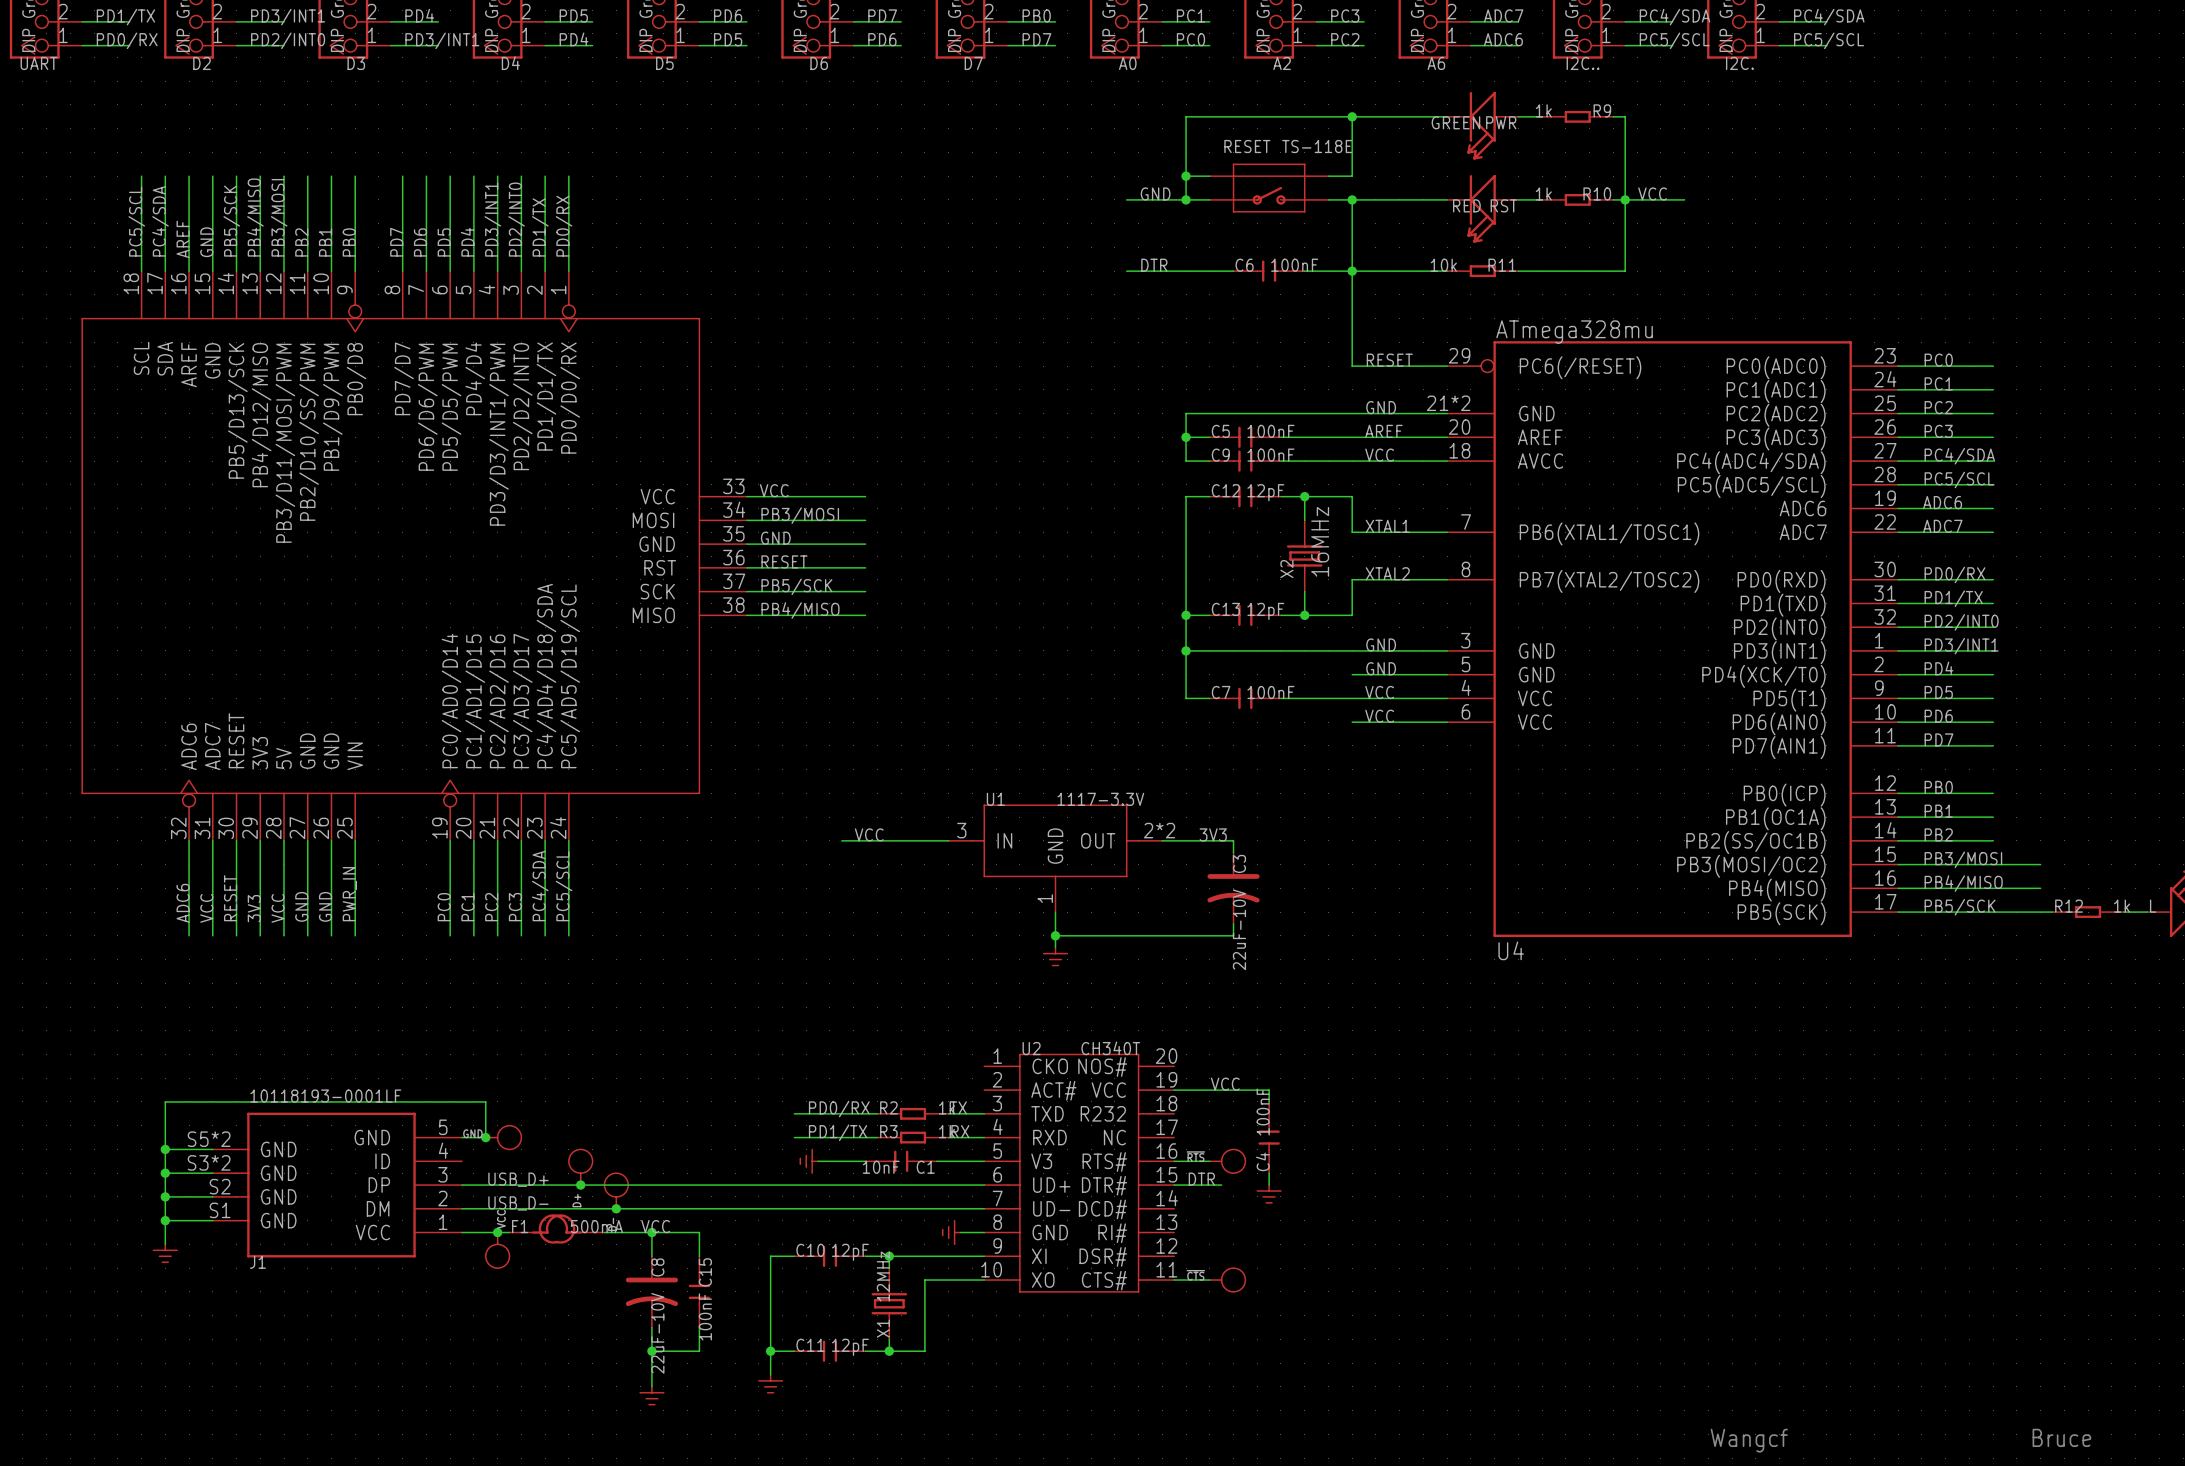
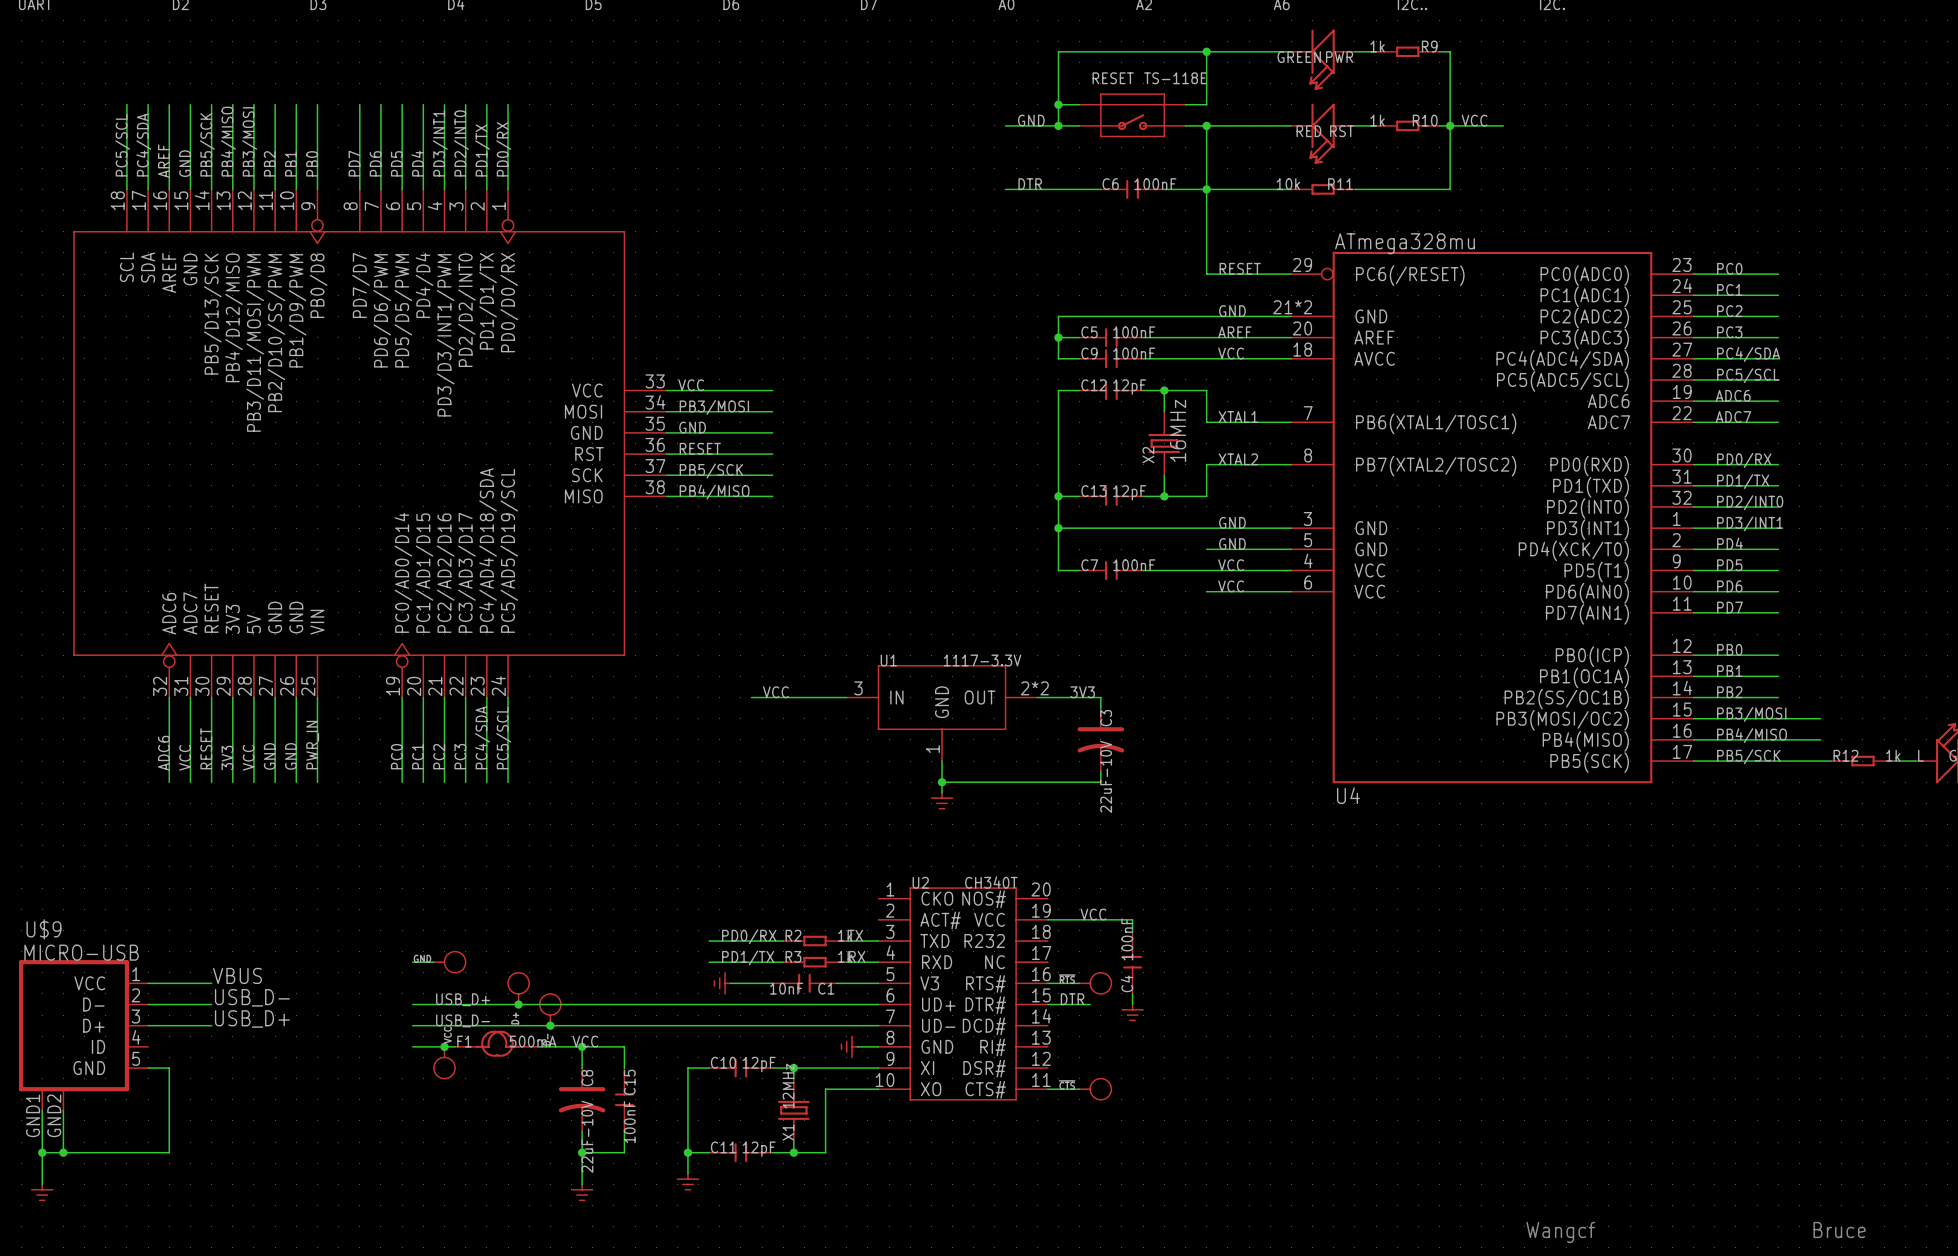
wire: (485, 1137) (485, 1101) (165, 1101) (165, 1244) -> none
junction: (485, 1137) -> none
wire: (165, 1149) (212, 1149) -> none
junction: (165, 1149) -> none
label: none -> VBUS (237, 975)
wire: none -> (148, 983) (211, 983)
wire: (165, 1173) (212, 1173) -> none
junction: (165, 1173) -> none
label: none -> USB_D- (252, 997)
wire: none -> (148, 1004) (211, 1004)
J1: 10118193-0001LF (337, 1185) -> none
wire: (165, 1196) (212, 1196) -> none
junction: (165, 1196) -> none
label: none -> USB_D+ (252, 1018)
wire: none -> (148, 1025) (211, 1025)
U$9: none -> MICRO-USB (83, 1035)
wire: (165, 1220) (212, 1220) -> none
junction: (165, 1220) -> none
power symbol position: (165, 1253) -> (42, 1192)
wire: none -> (148, 1068) (169, 1068) (169, 1152) (42, 1152)
wire: none -> (42, 1110) (42, 1184)
wire: none -> (63, 1110) (63, 1152)
junction: none -> (42, 1152)
junction: none -> (63, 1152)

